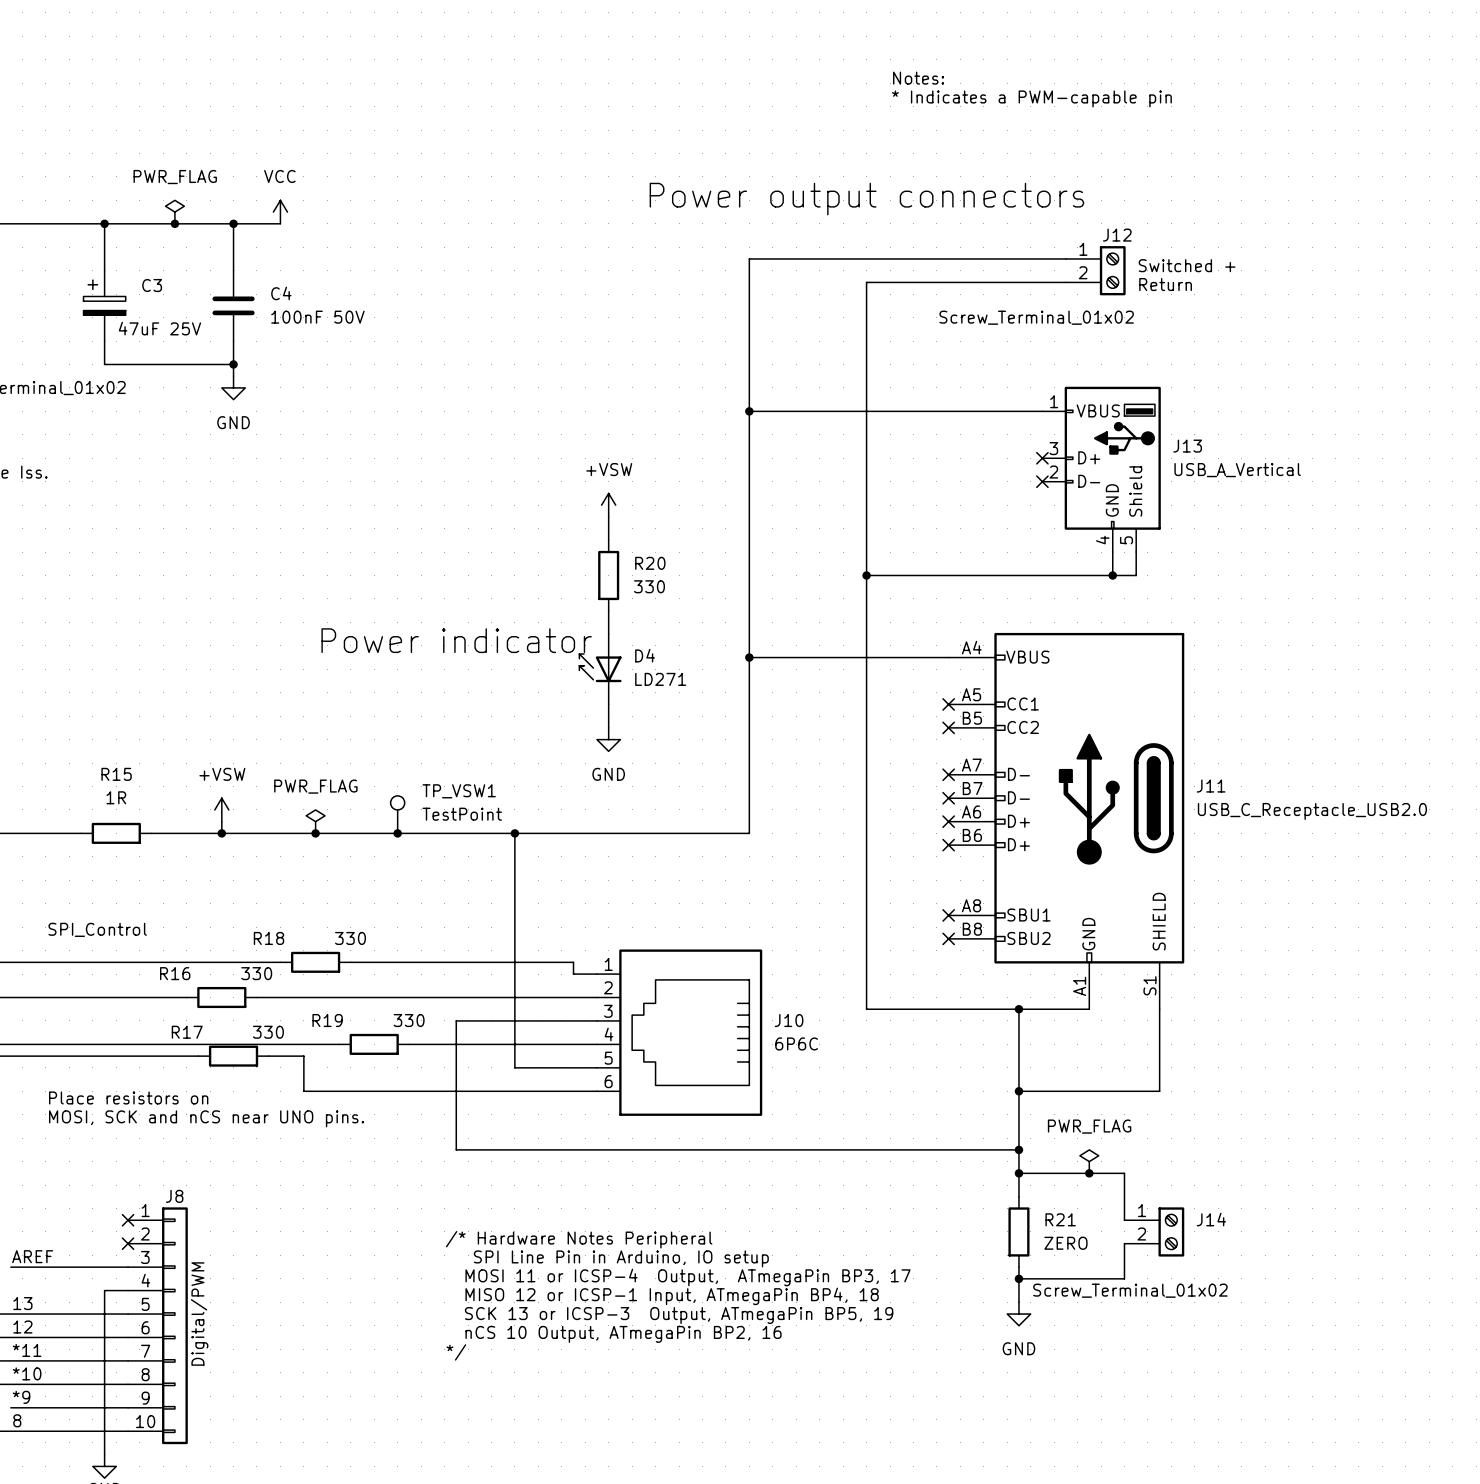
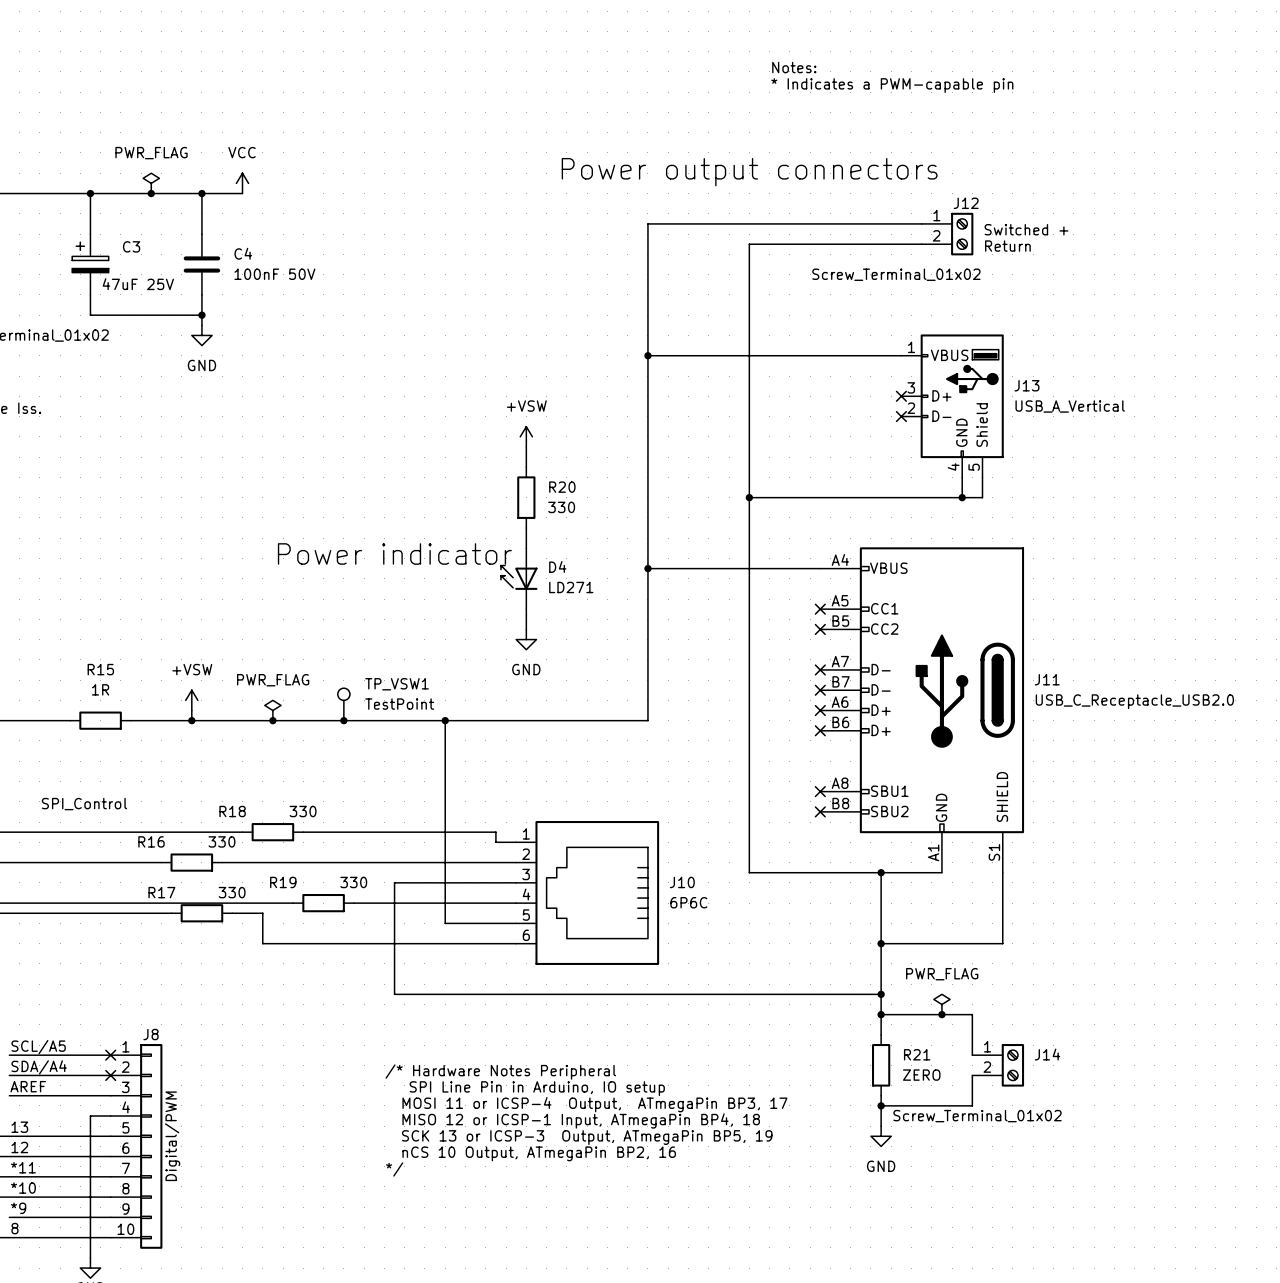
text: Place resistors on (128, 1097) -> none
text: MOSI, SCK and nCS near UNO pins. (206, 1118) -> none
label: none -> SCL/A5 (38, 1047)
wire: none -> (9, 1055) (110, 1055)
label: none -> SDA/A4 (39, 1067)
wire: none -> (9, 1075) (110, 1075)

